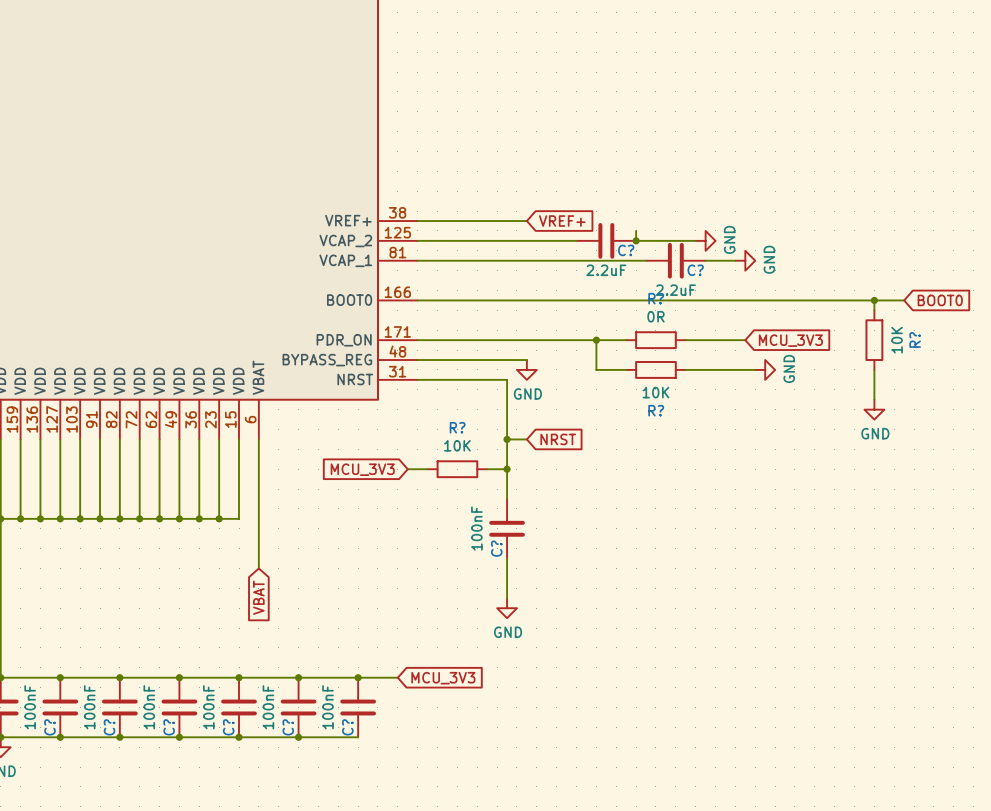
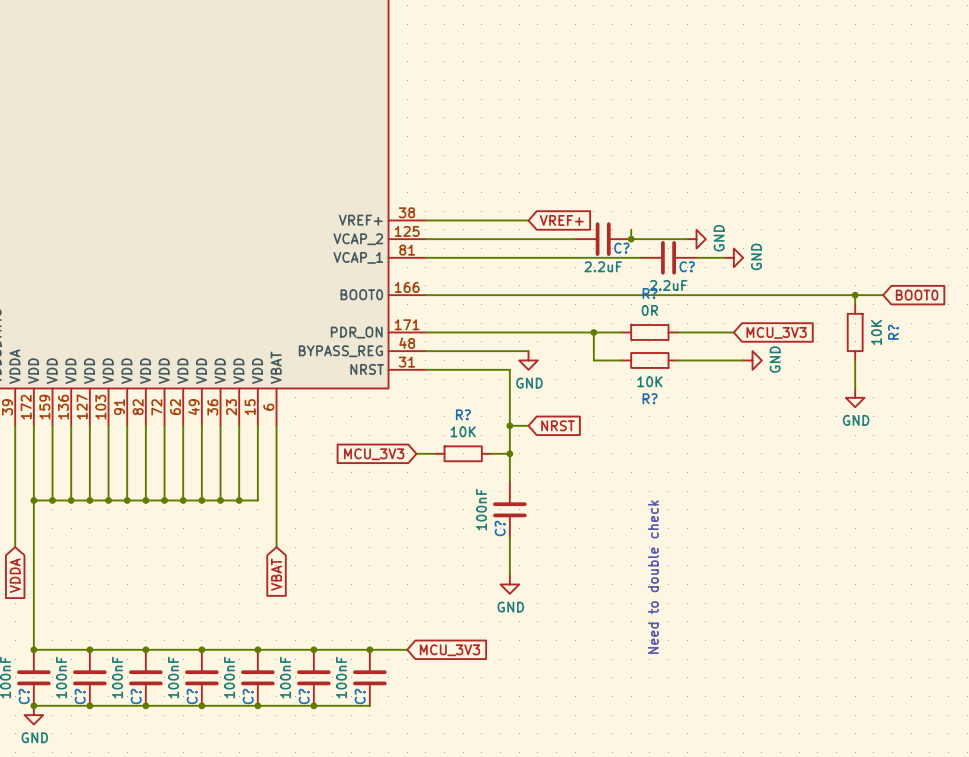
text: none -> Need to double check (653, 577)

